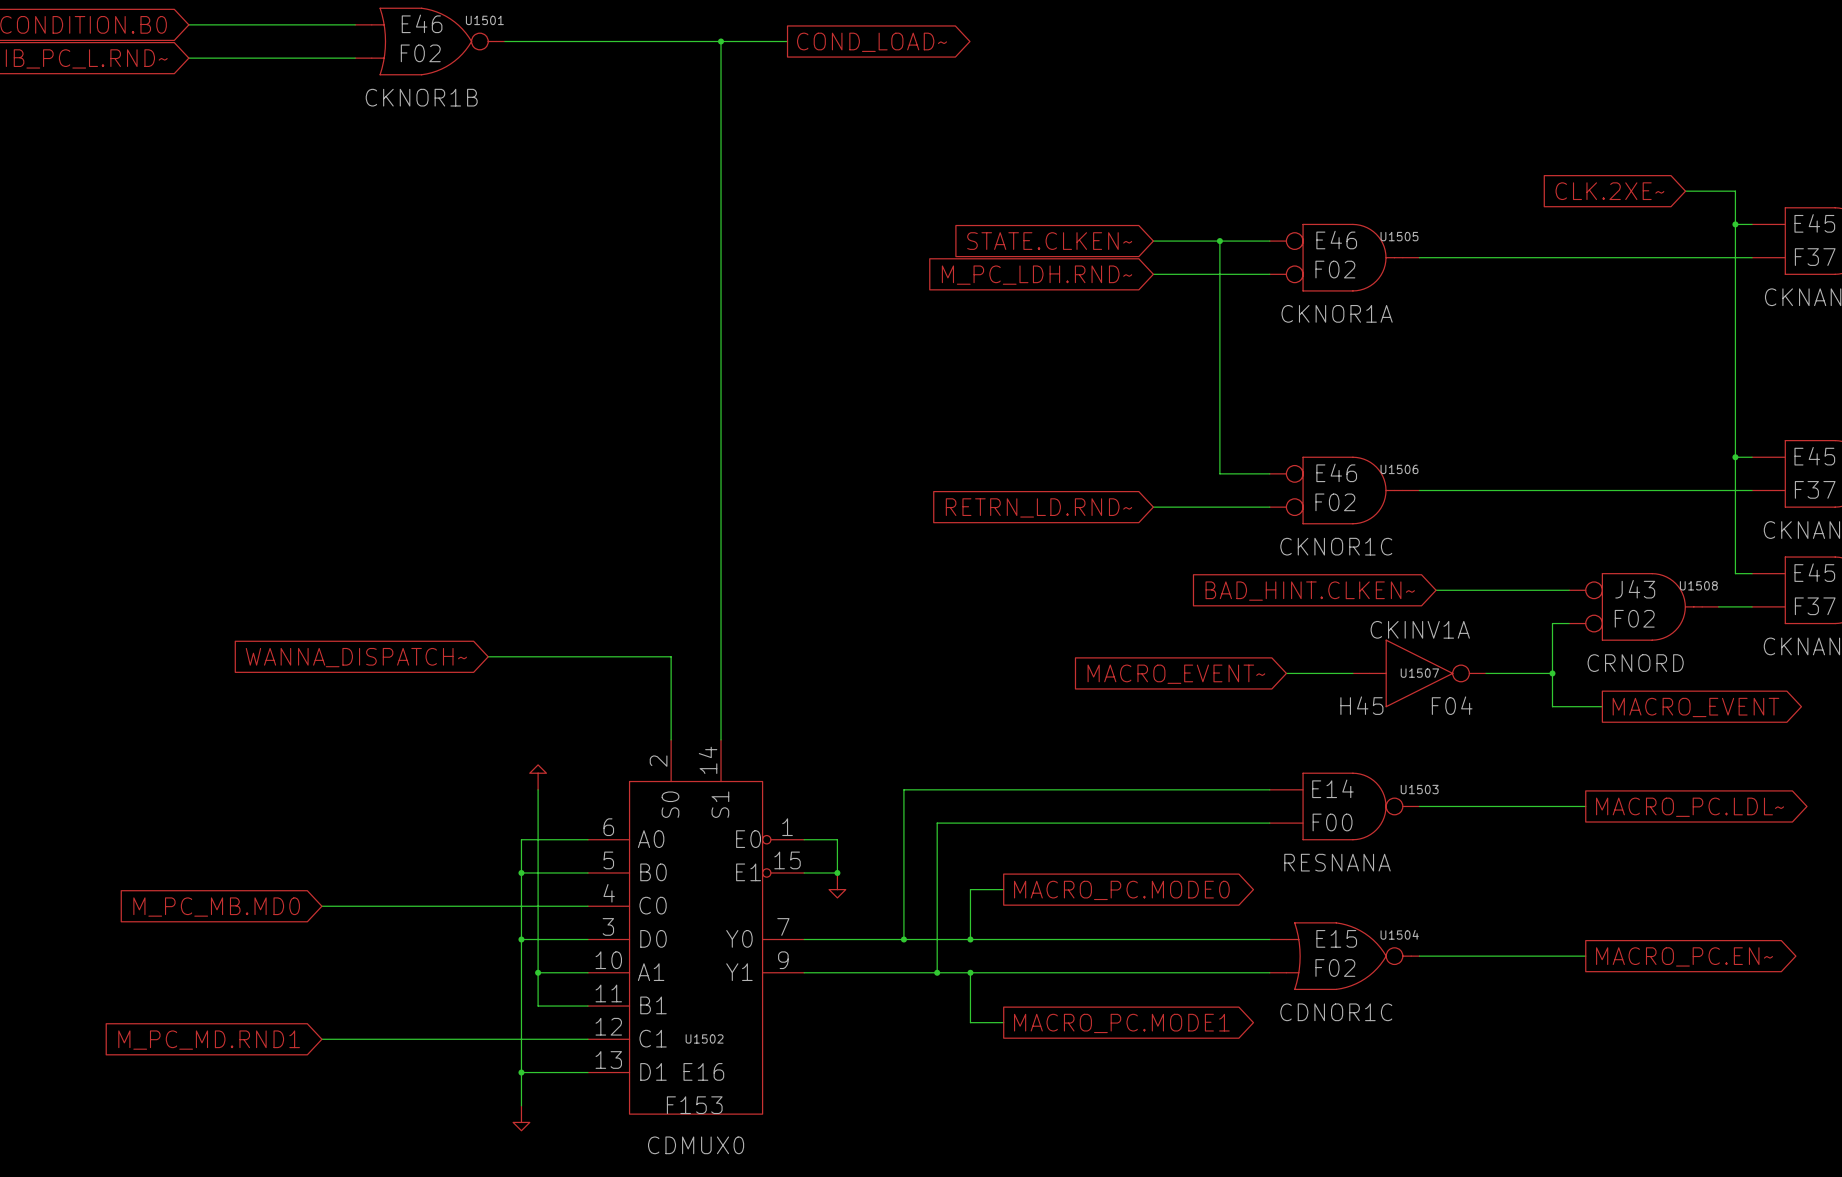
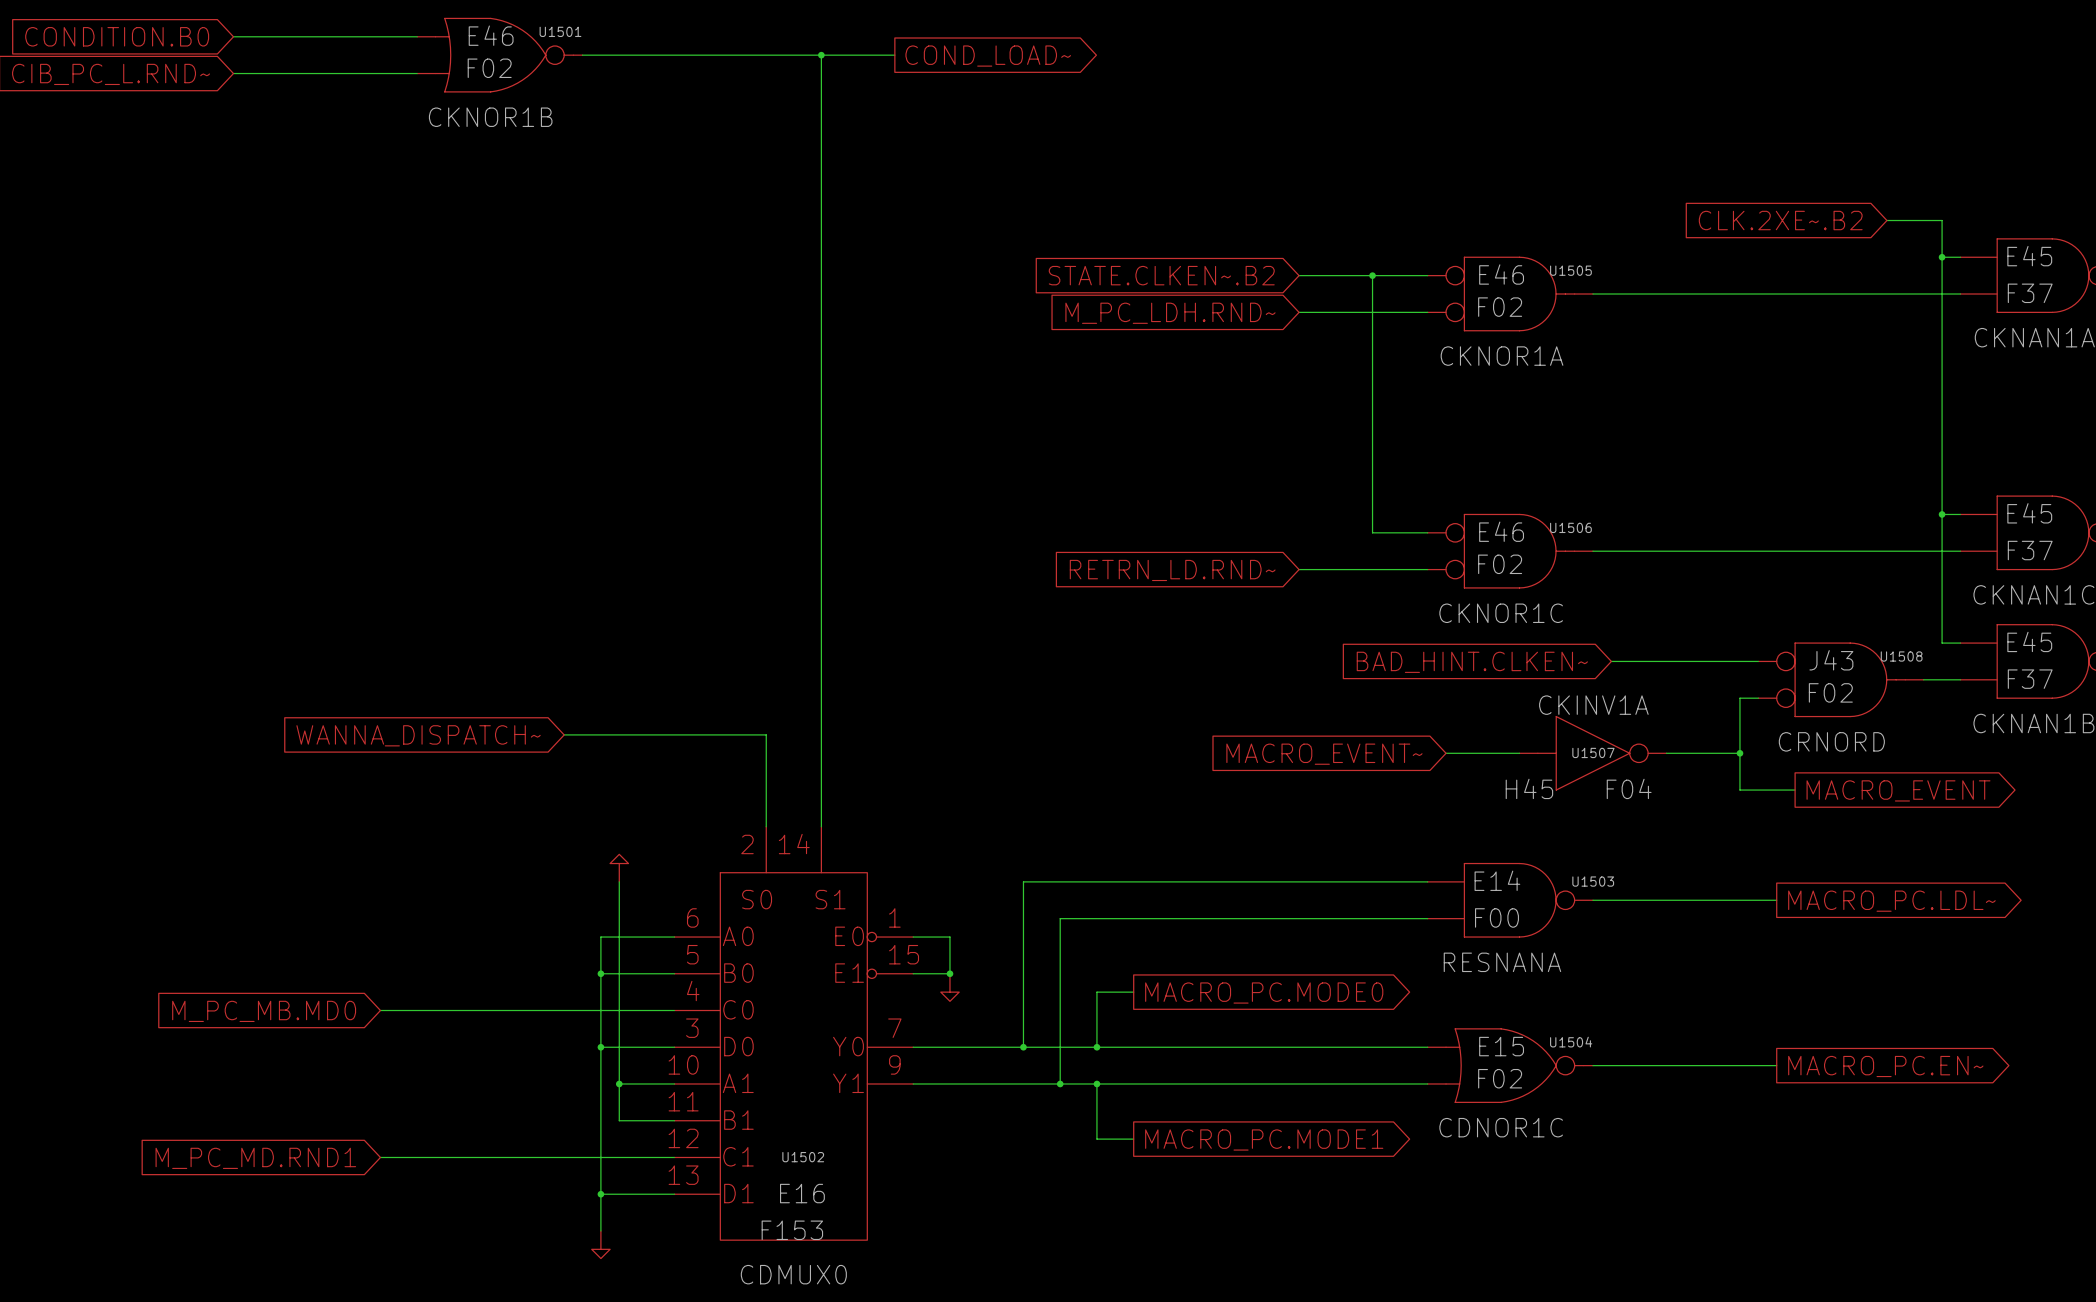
global label: CLK.2XE~ (1609, 191) -> CLK.2XE~.B2 (1780, 220)
global label: STATE.CLKEN~ (1049, 241) -> STATE.CLKEN~.B2 (1161, 275)
U1502 symbol: [587, 739, 805, 1115] -> [674, 826, 914, 1241]

